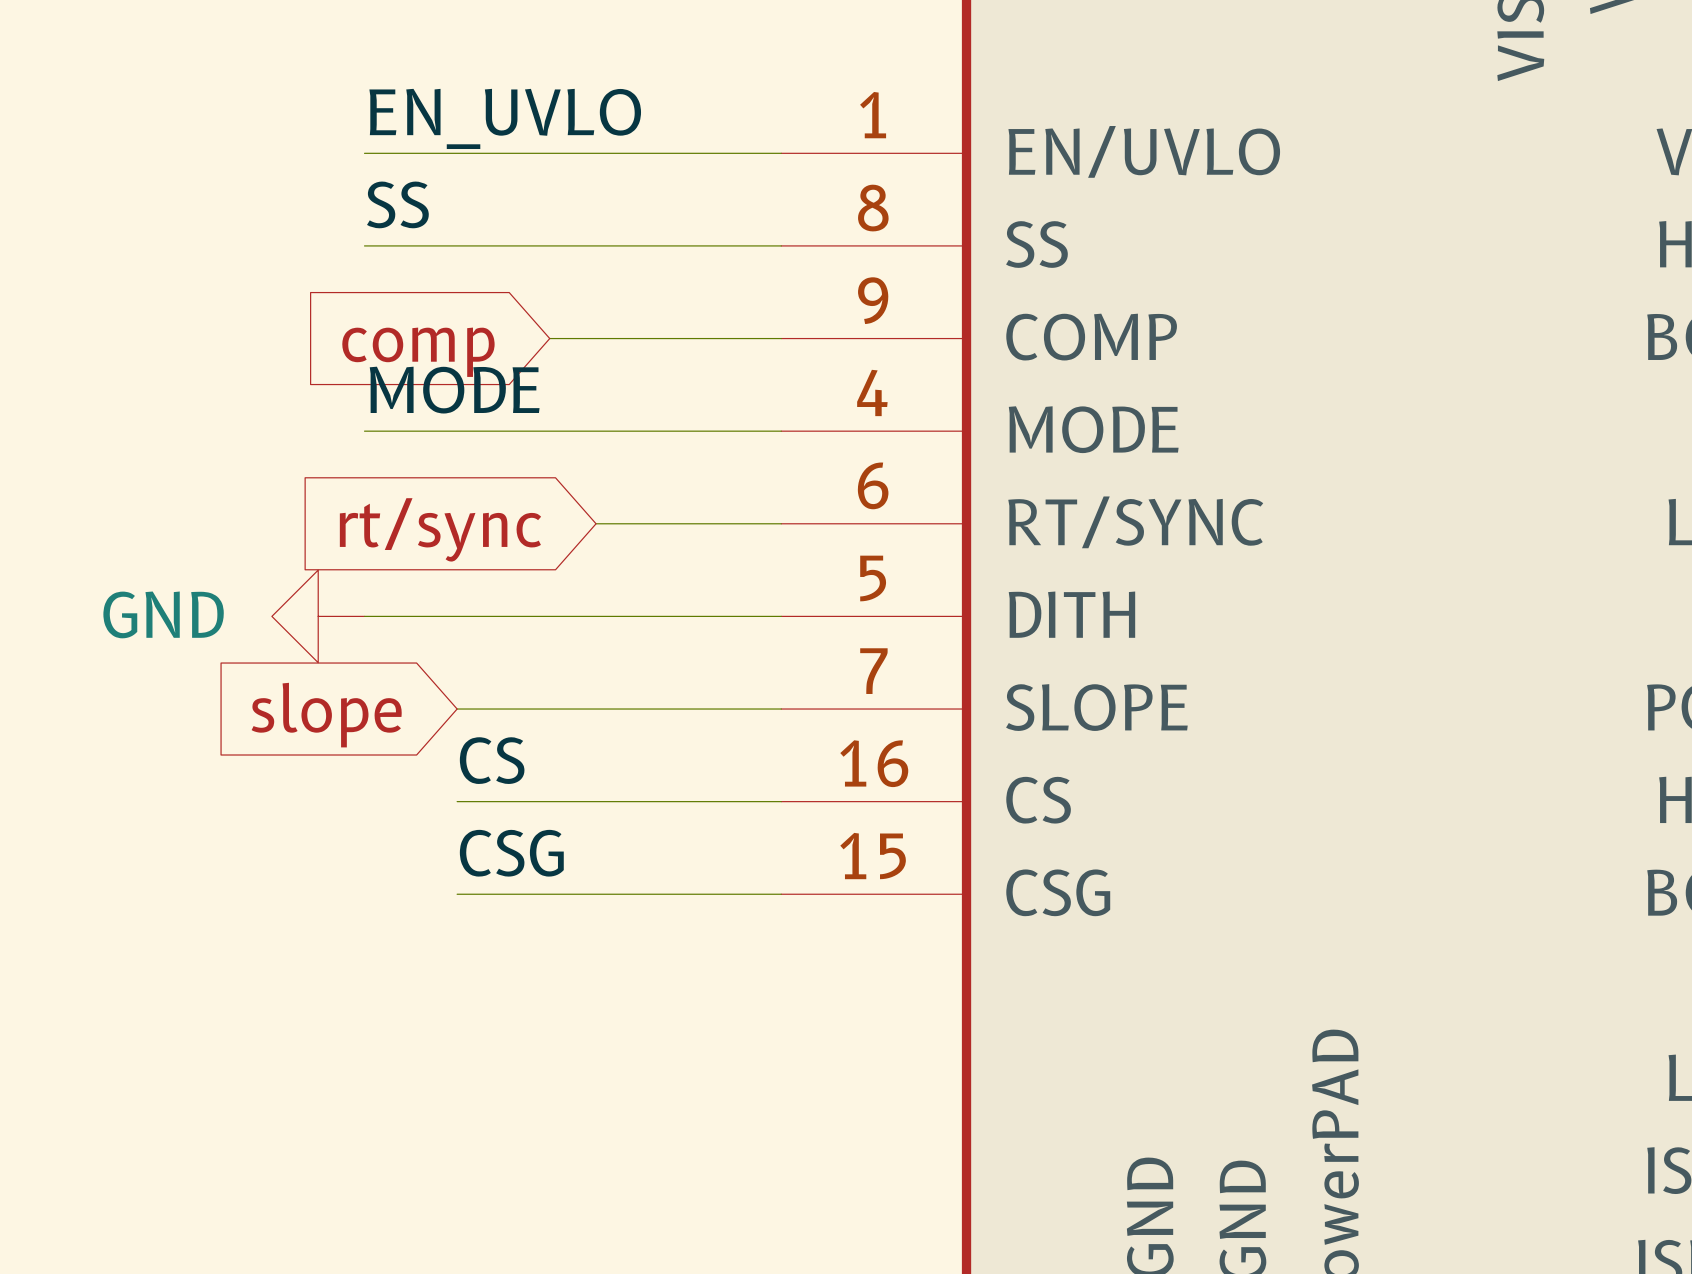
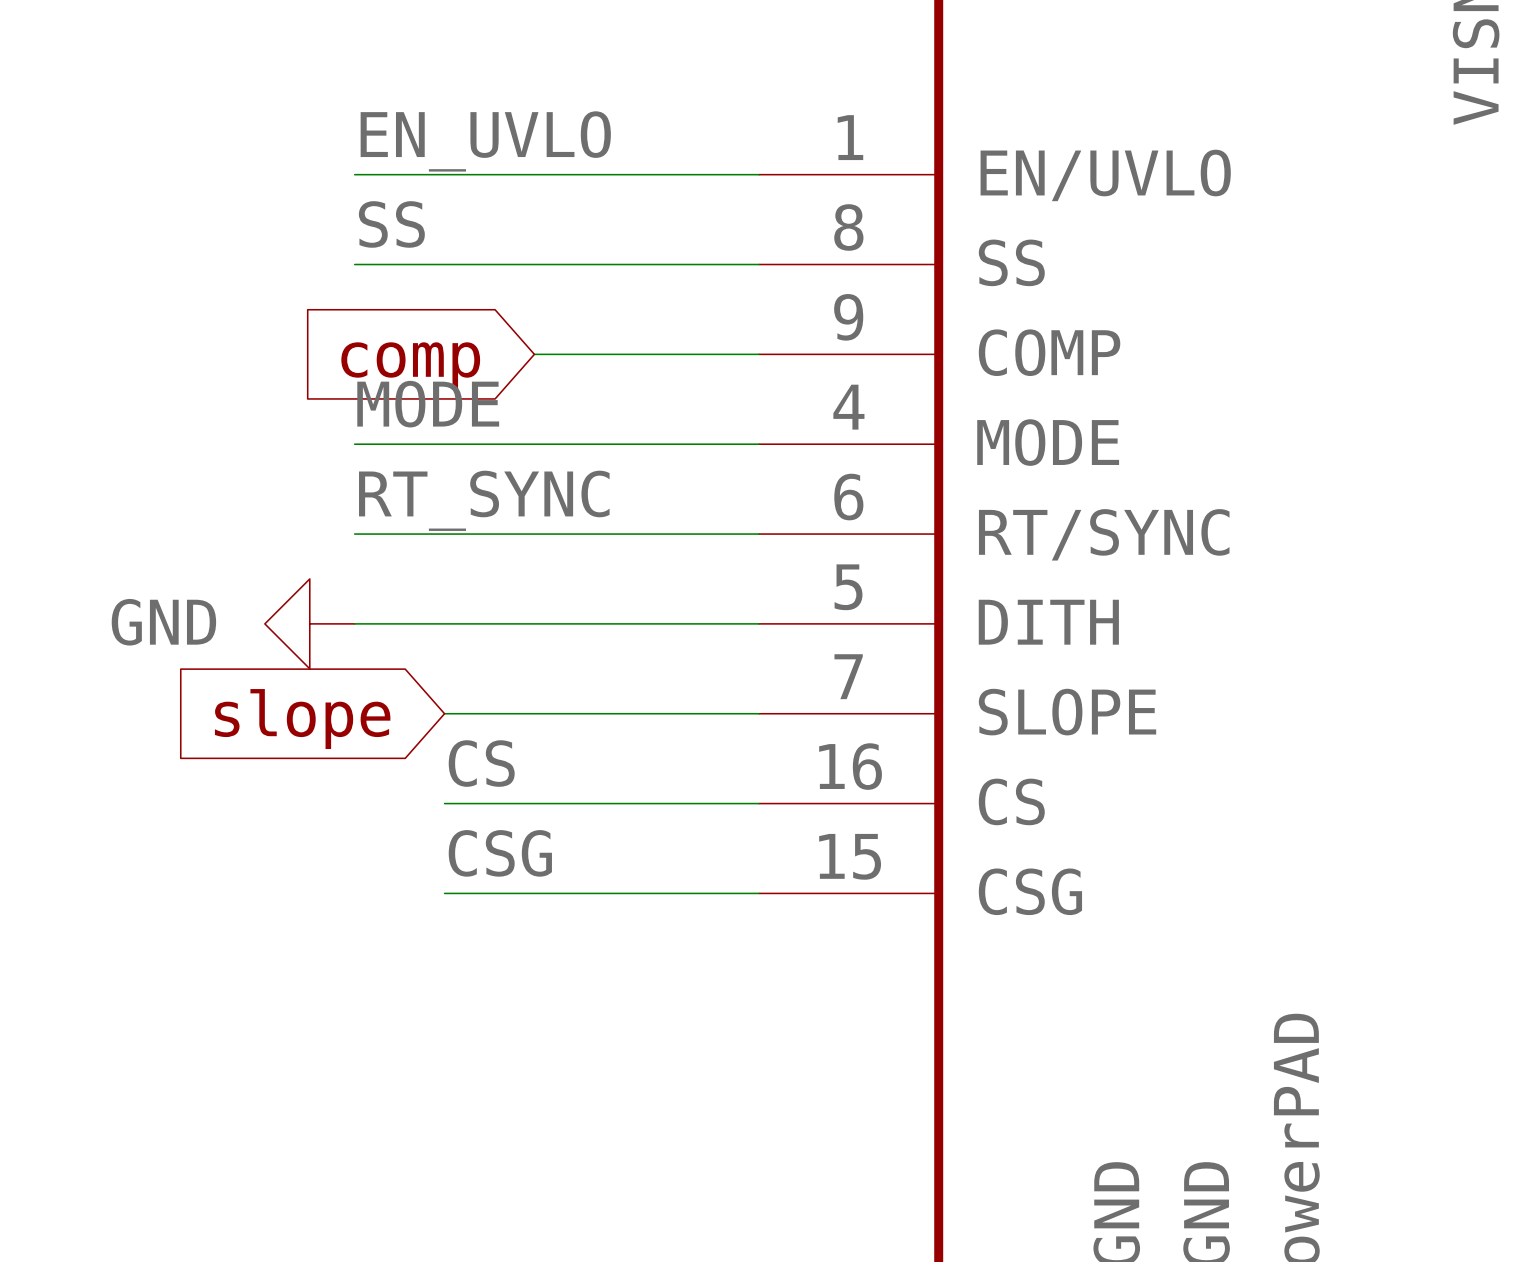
label: none -> RT_SYNC (484, 500)
wire: none -> (354, 534) (579, 534)
global label: rt/sync (440, 529) -> none

